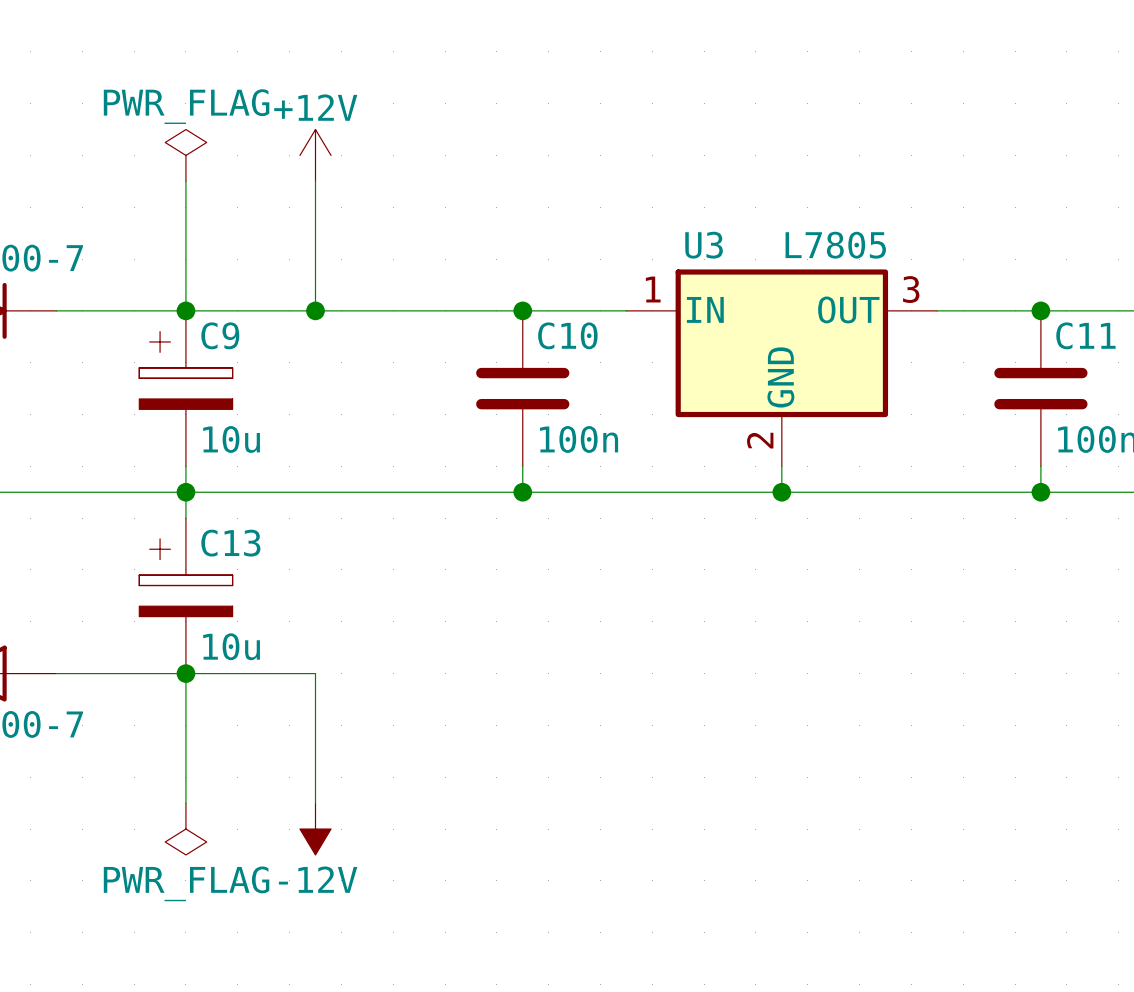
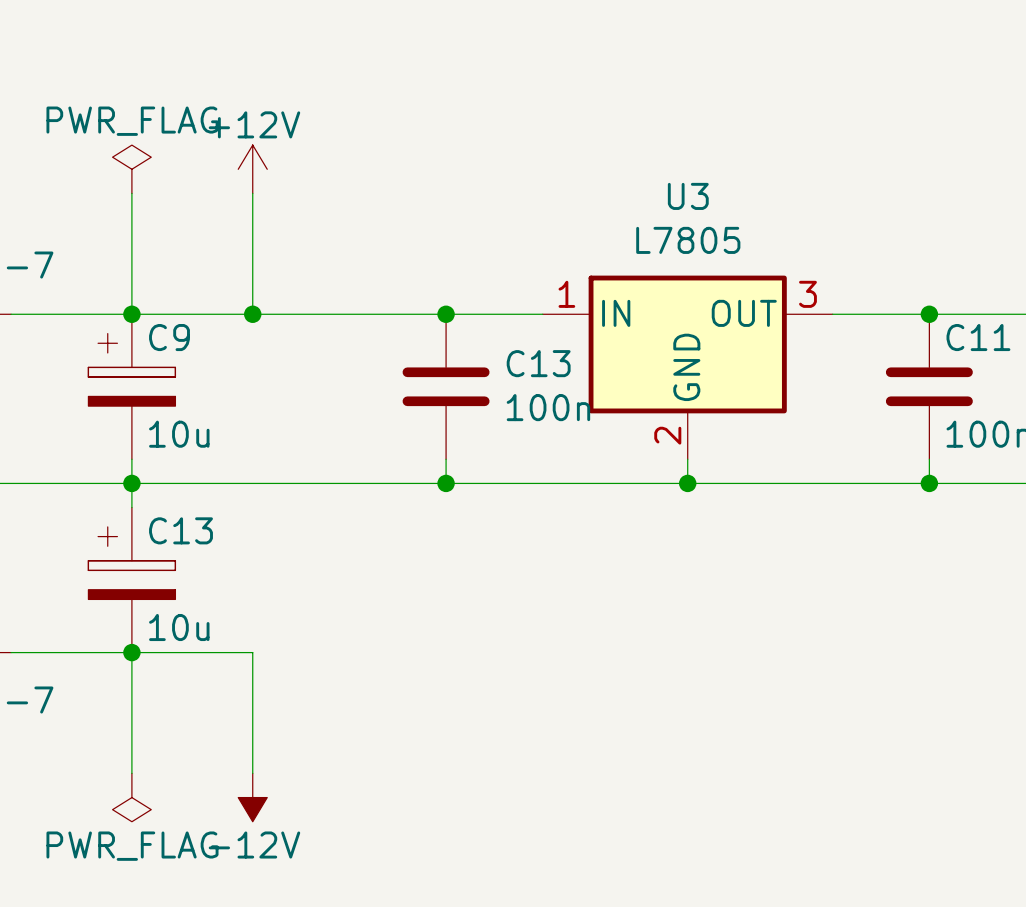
U3 name position: U3 (704, 245) -> U3 (688, 196)
U3 value position: L7805 (835, 245) -> L7805 (688, 240)
C10 name: C10 (567, 335) -> C13 (538, 363)
C10 value position: 100n (579, 439) -> 100n (548, 407)

